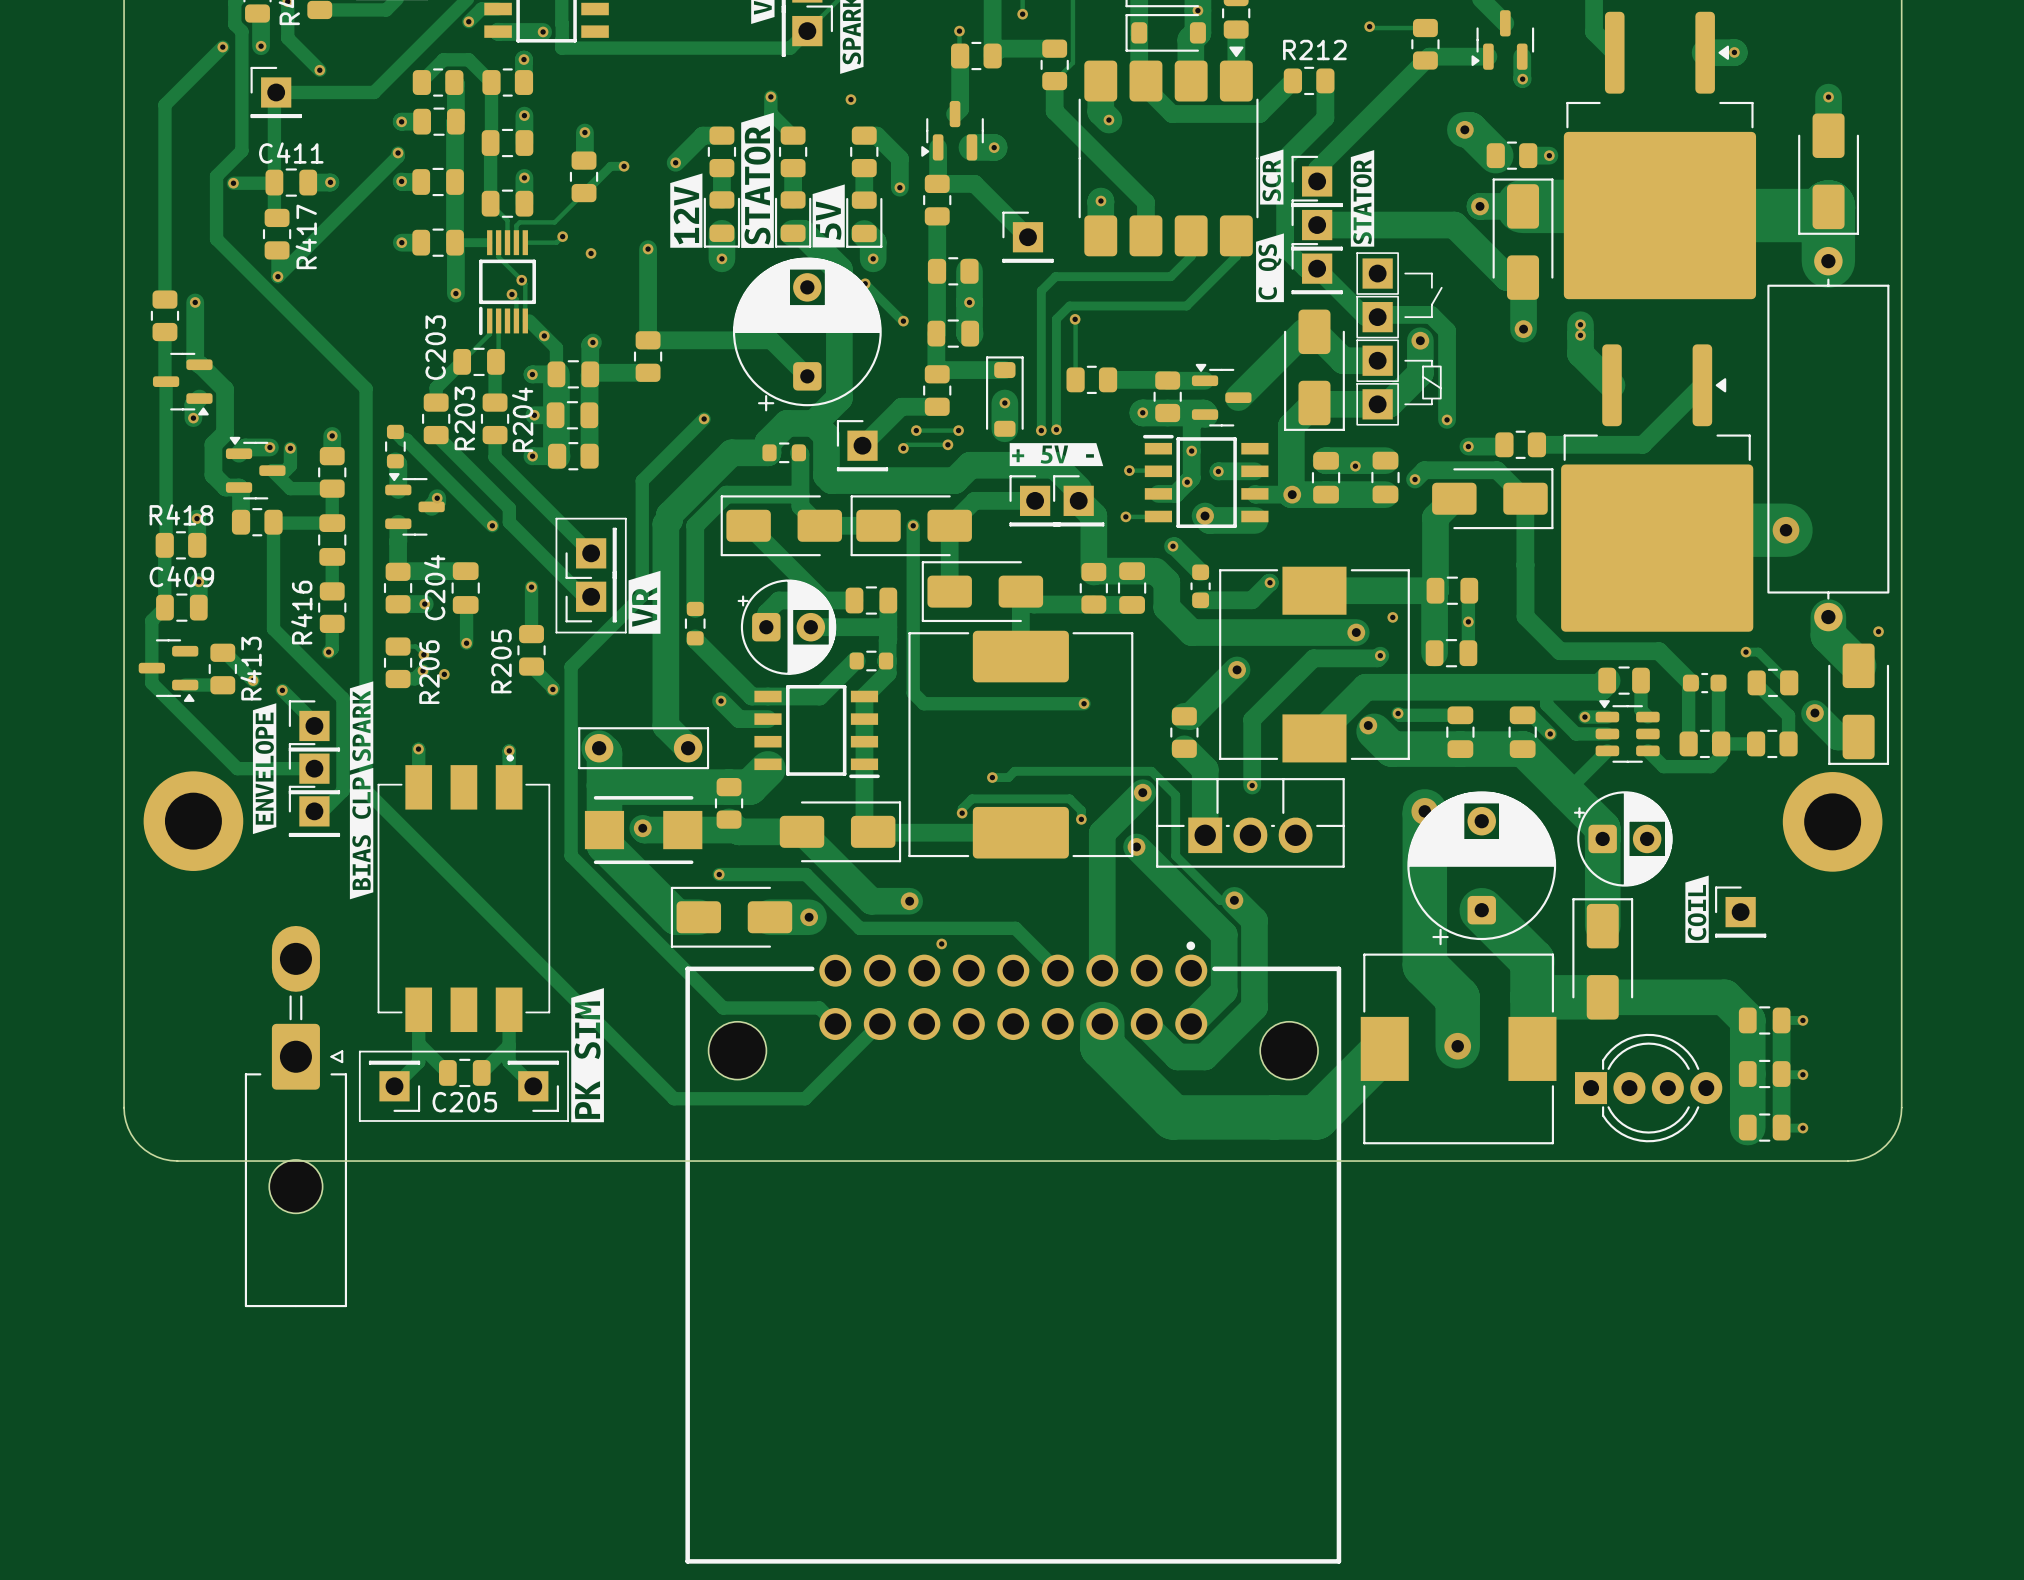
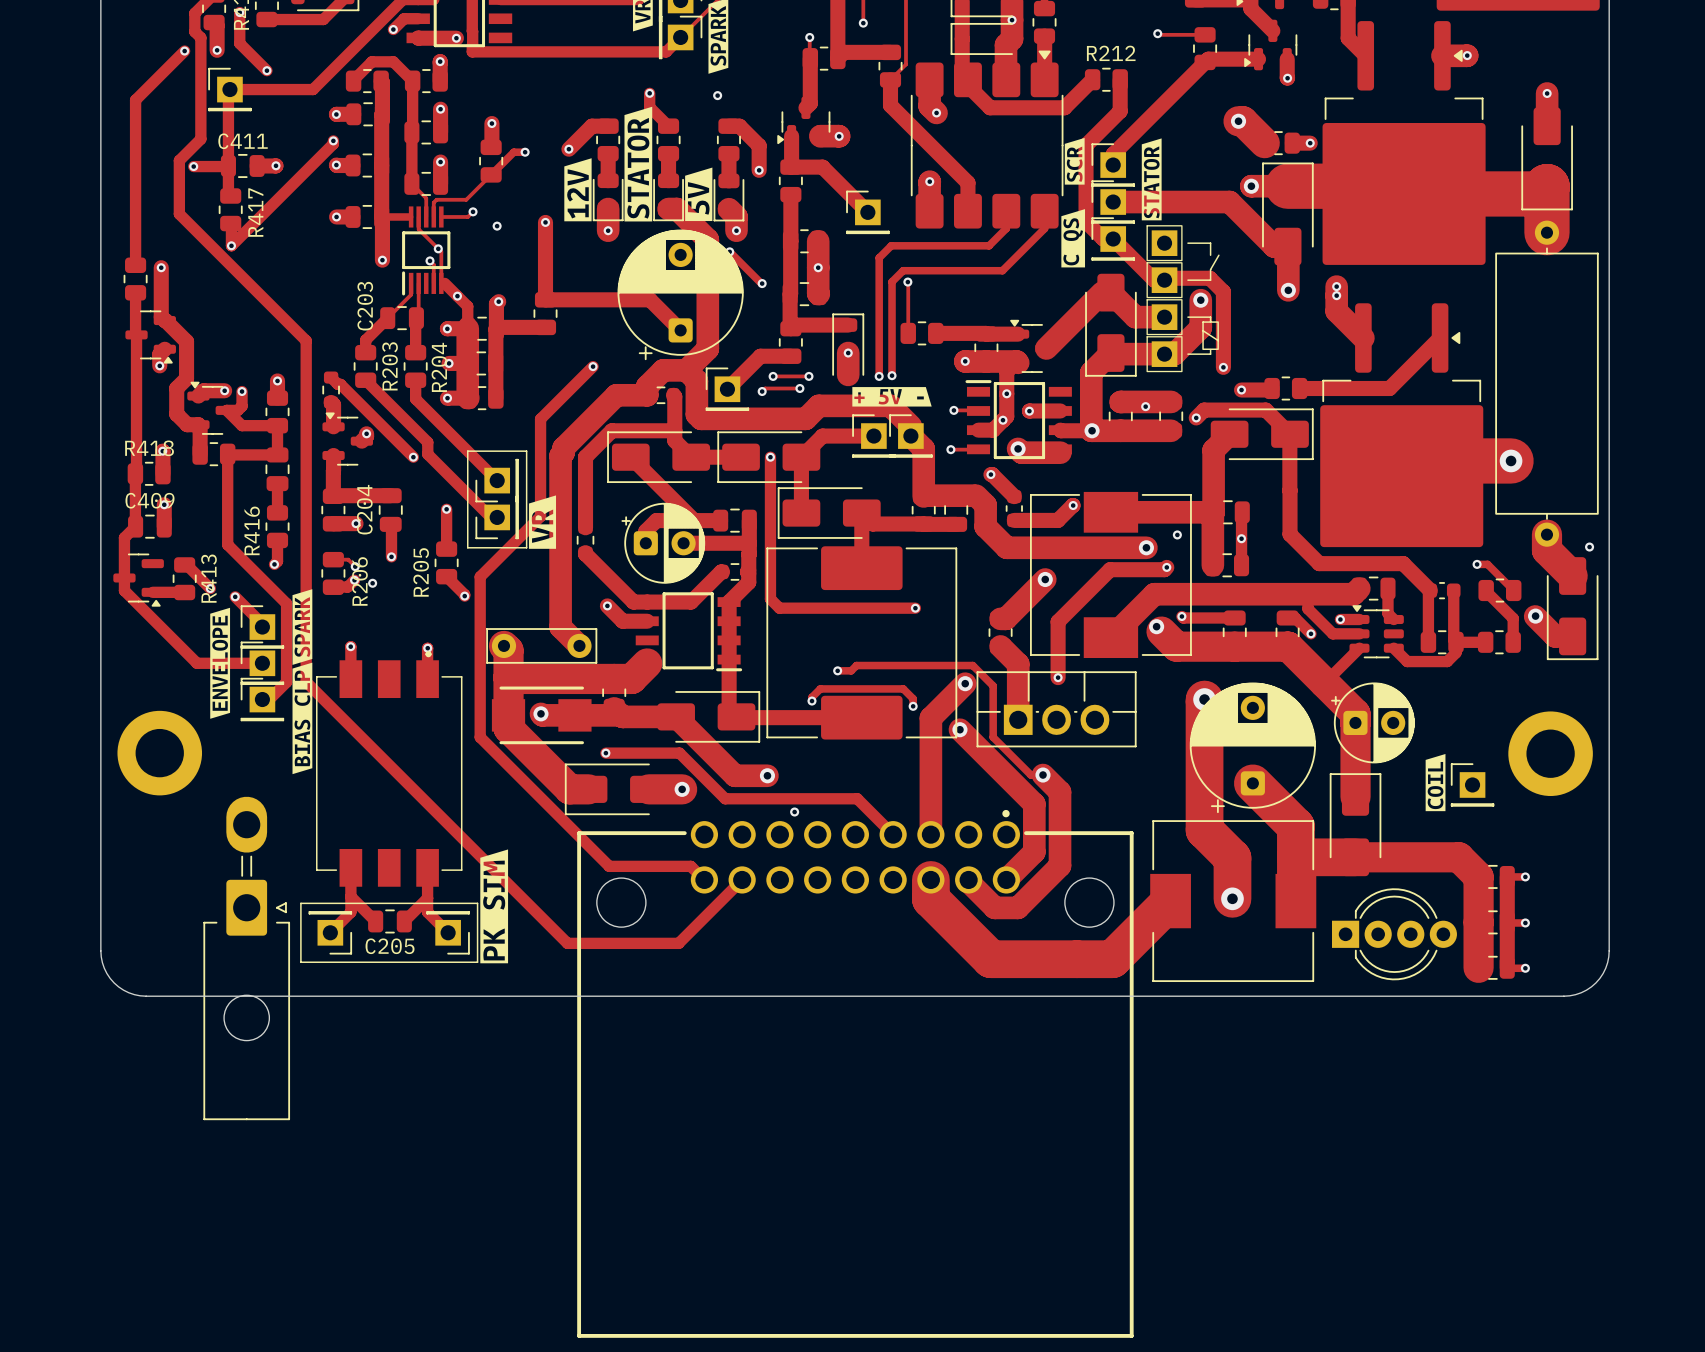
part position: (193, 821) -> (159, 753)
part position: (1832, 821) -> (1550, 753)

